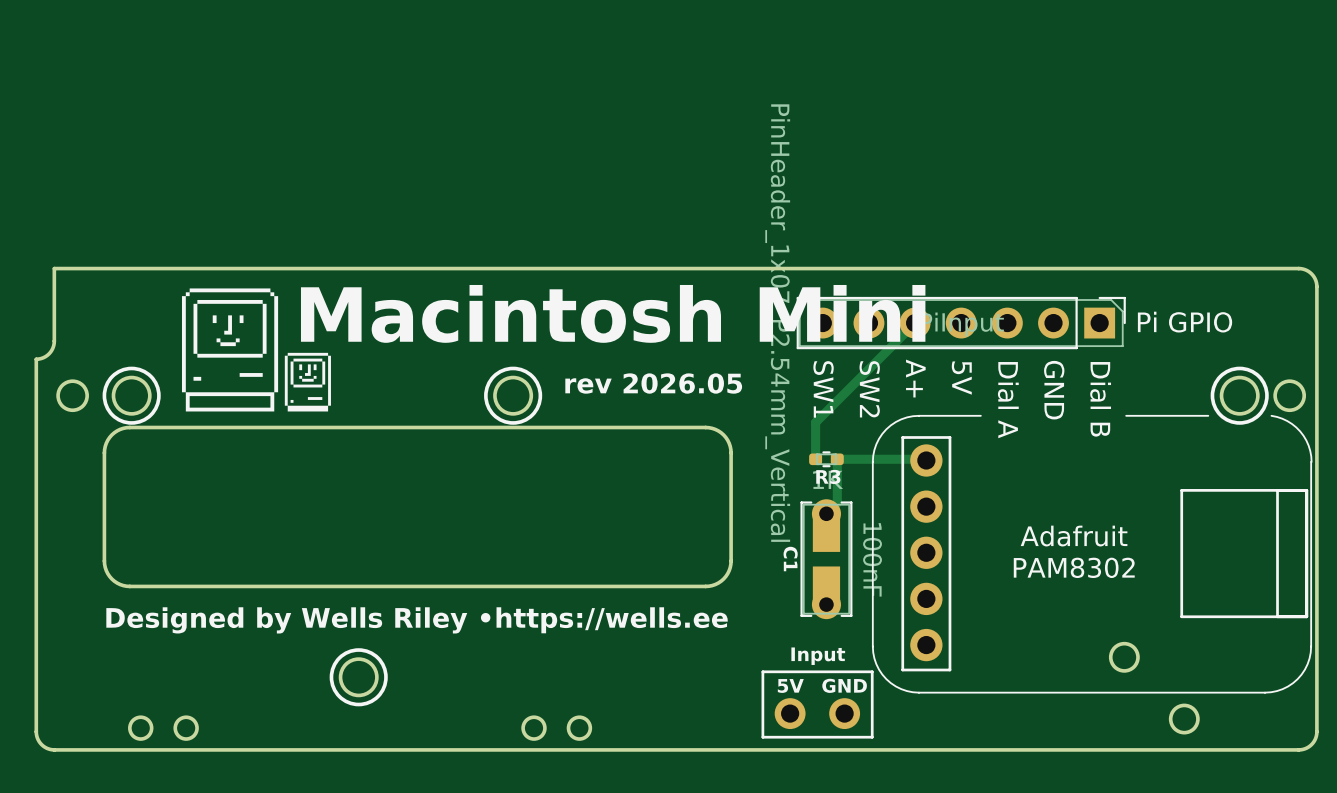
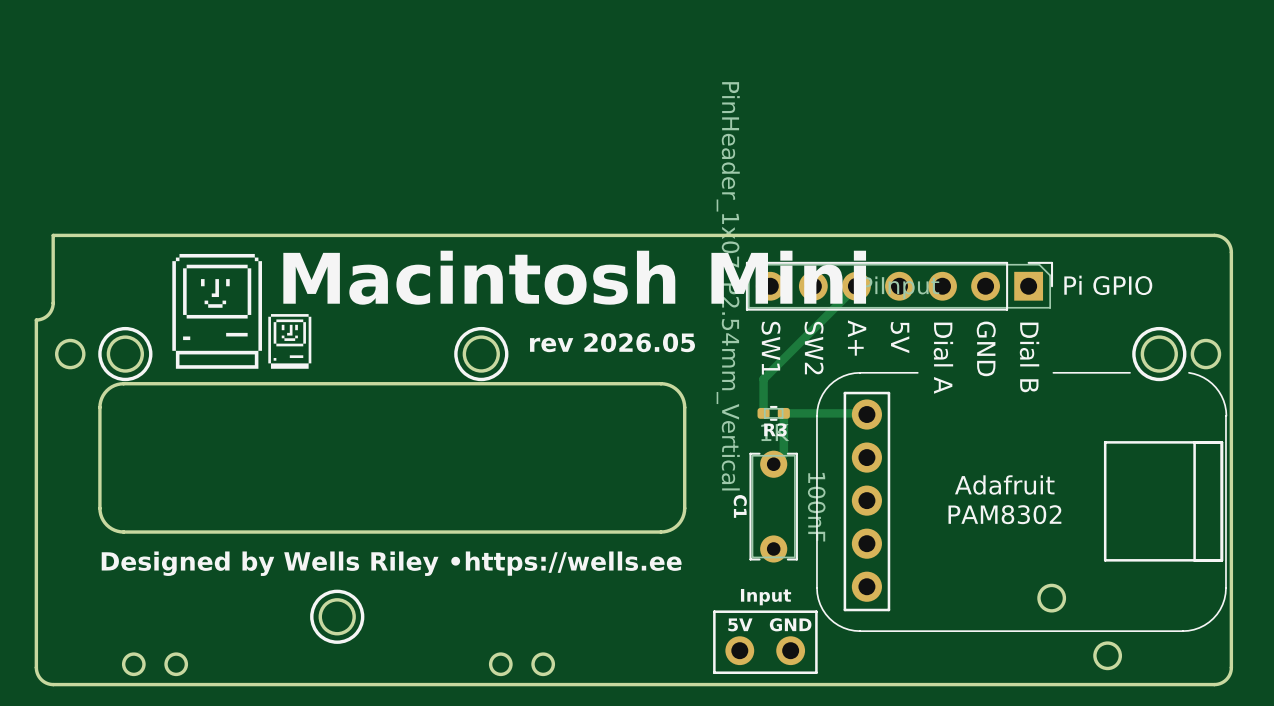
C1 footprint: [800, 499, 853, 620] -> [749, 450, 798, 563]

